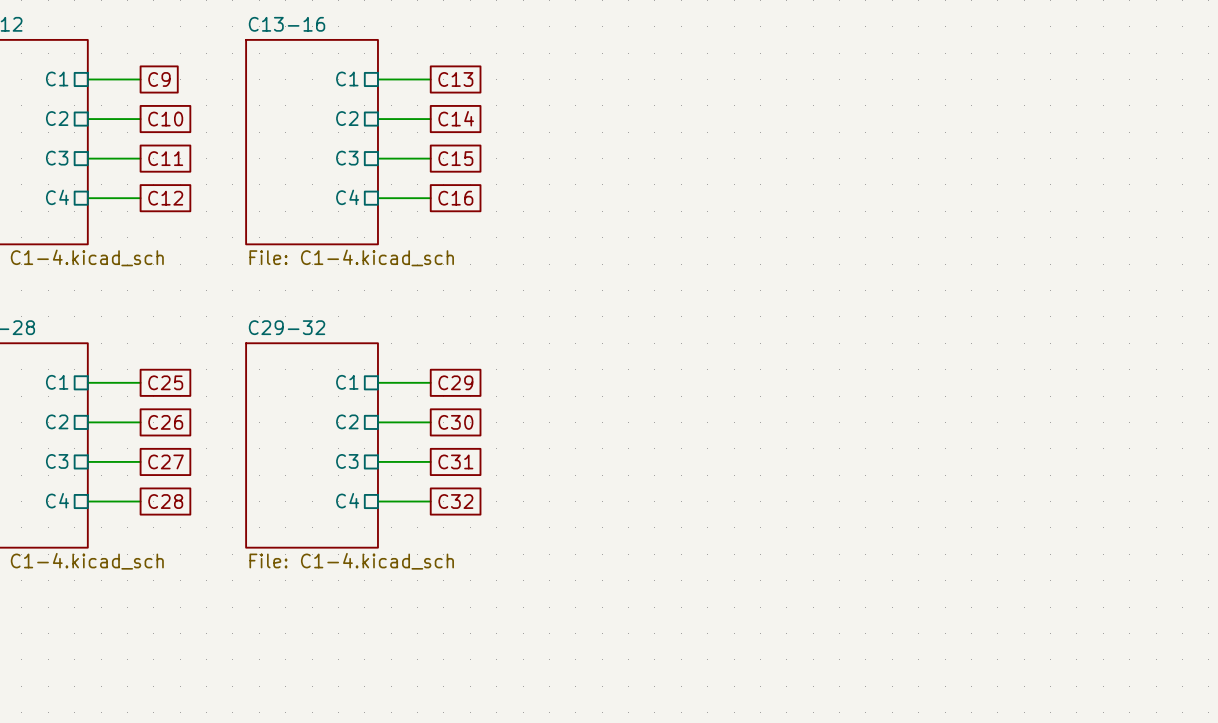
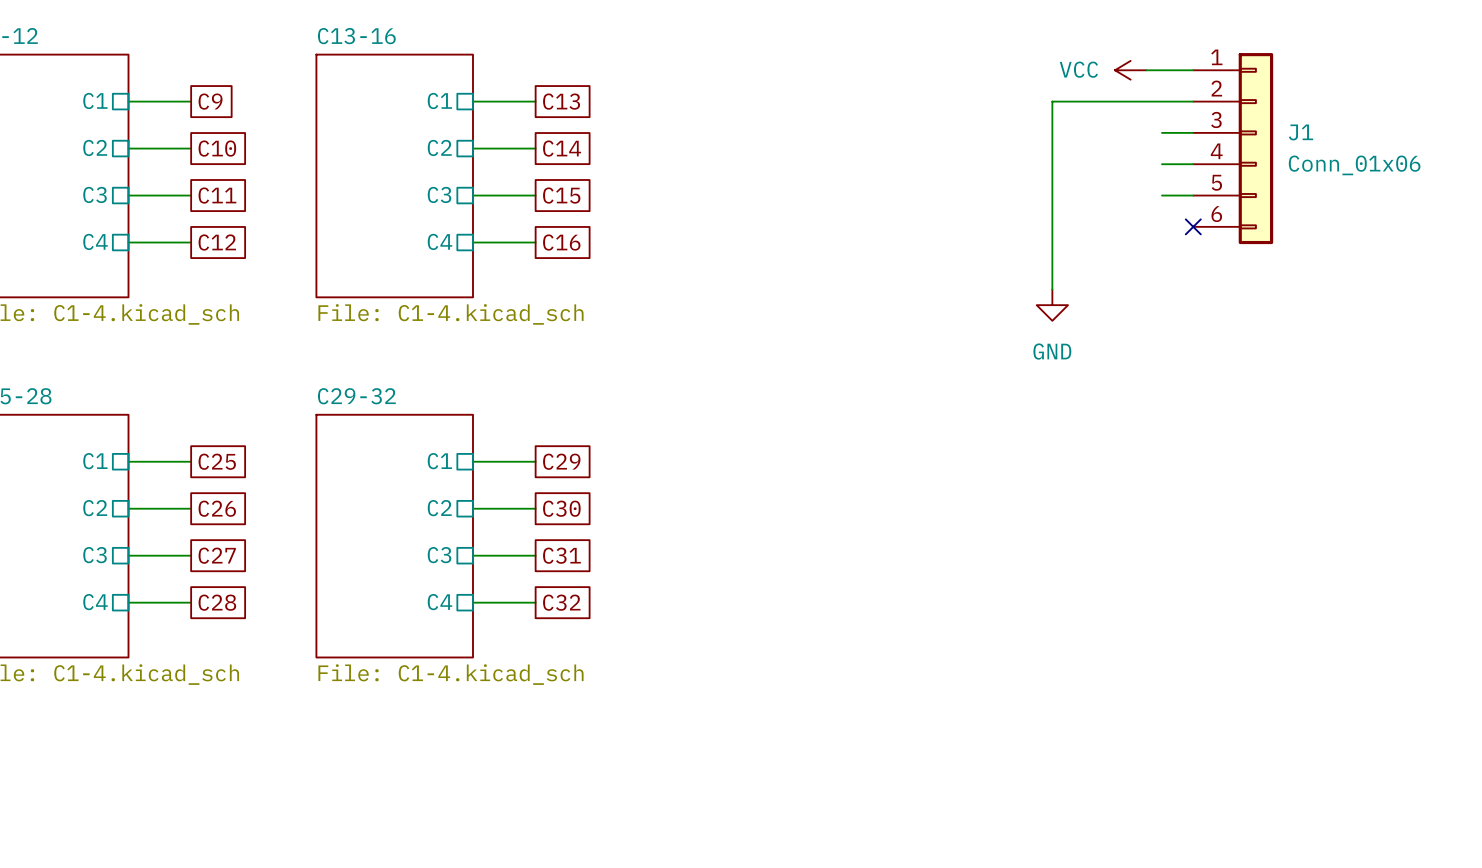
power symbol: none -> VCC (1130, 70)
wire: none -> (1146, 70) (1193, 70)
wire: none -> (1193, 101) (1052, 101) (1052, 289)
wire: none -> (1161, 132) (1193, 132)
J1: none -> Conn_01x06 (1233, 148)
wire: none -> (1161, 164) (1193, 164)
wire: none -> (1161, 195) (1193, 195)
no-connect mark: none -> (1193, 226)
power symbol: none -> GND (1052, 305)

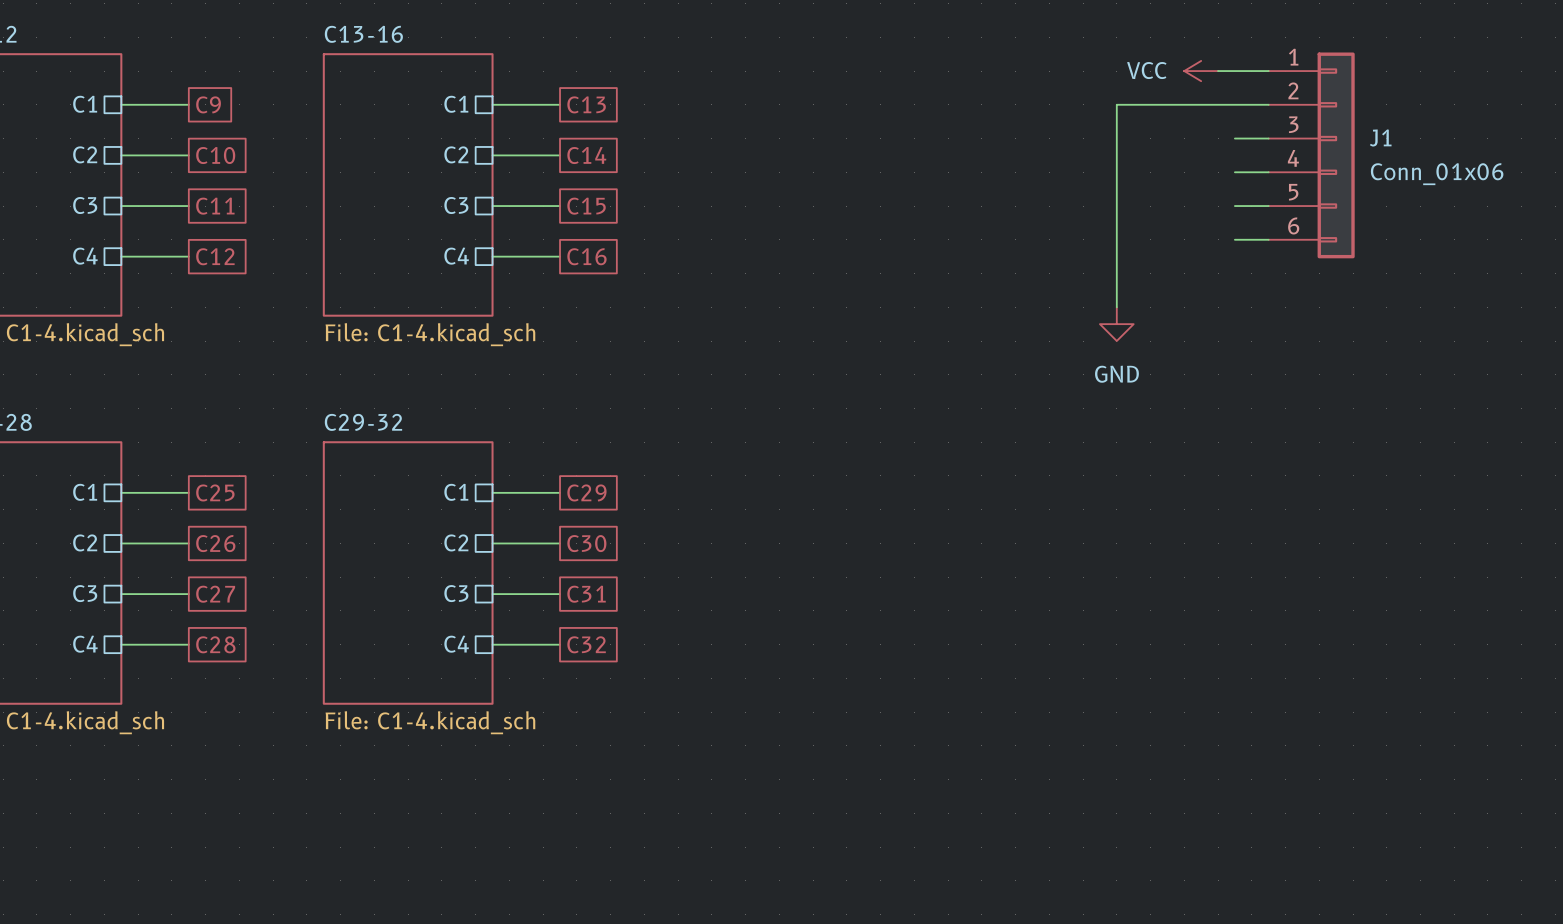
wire: none -> (1234, 239) (1268, 239)
no-connect mark: (1193, 226) -> none

